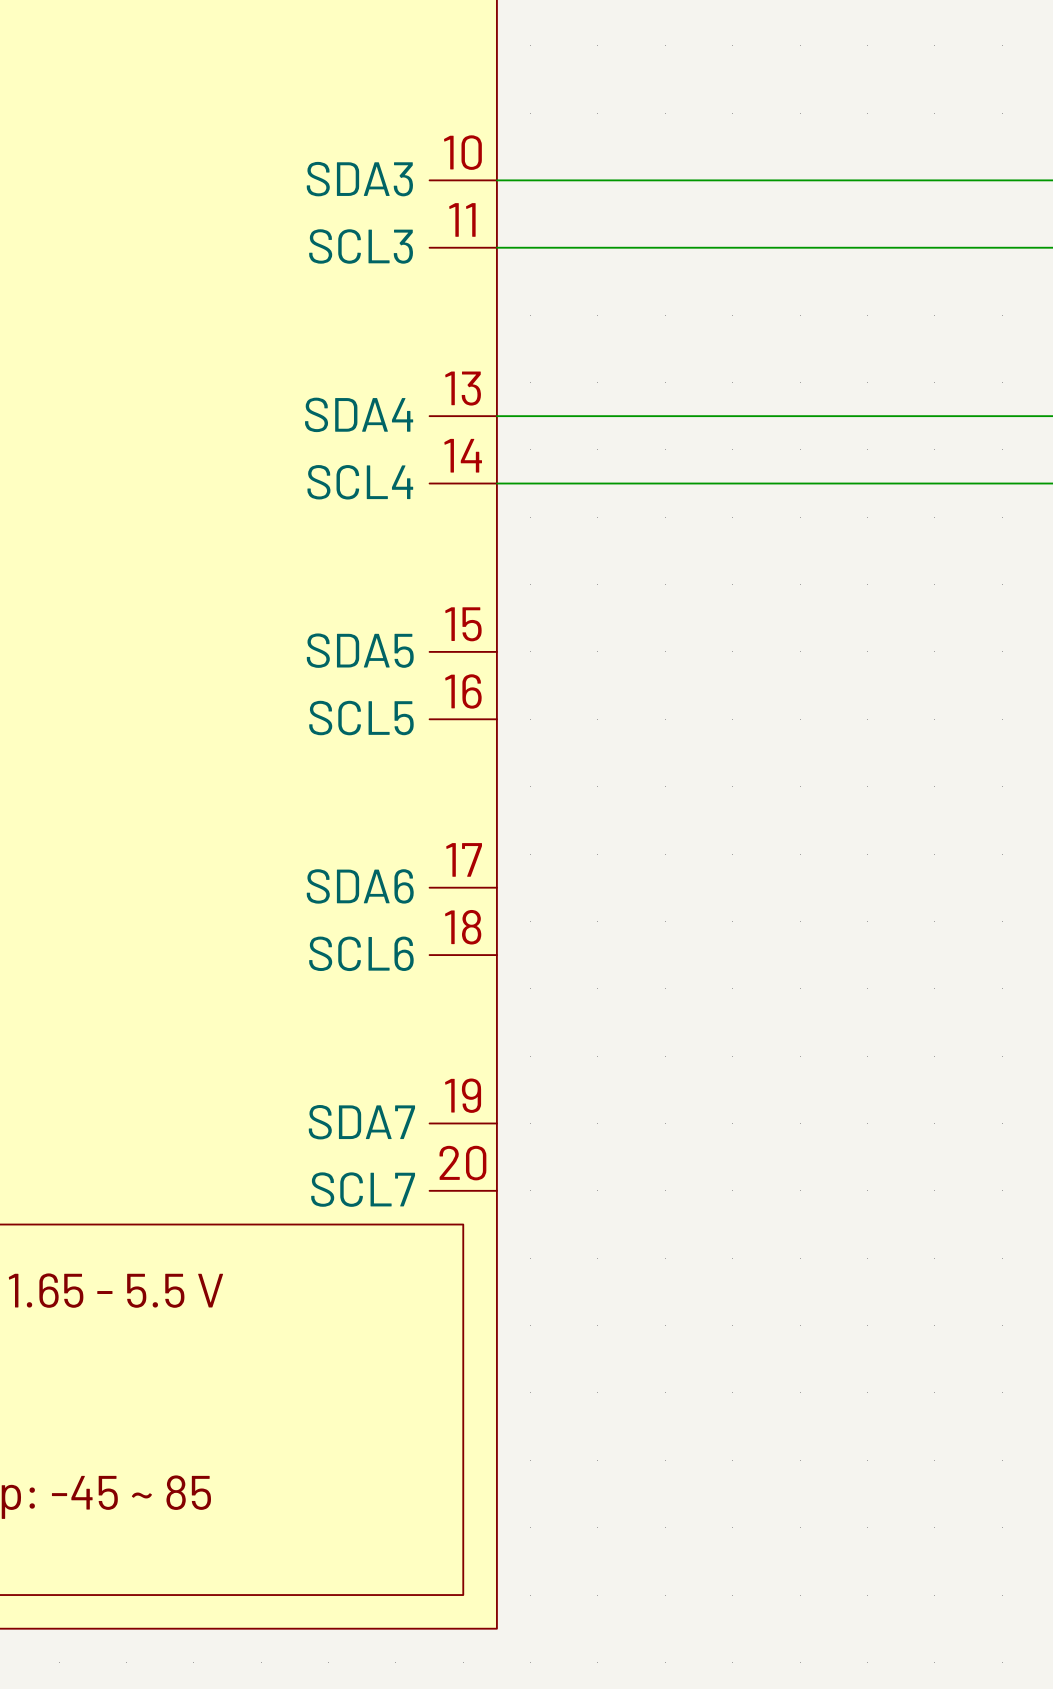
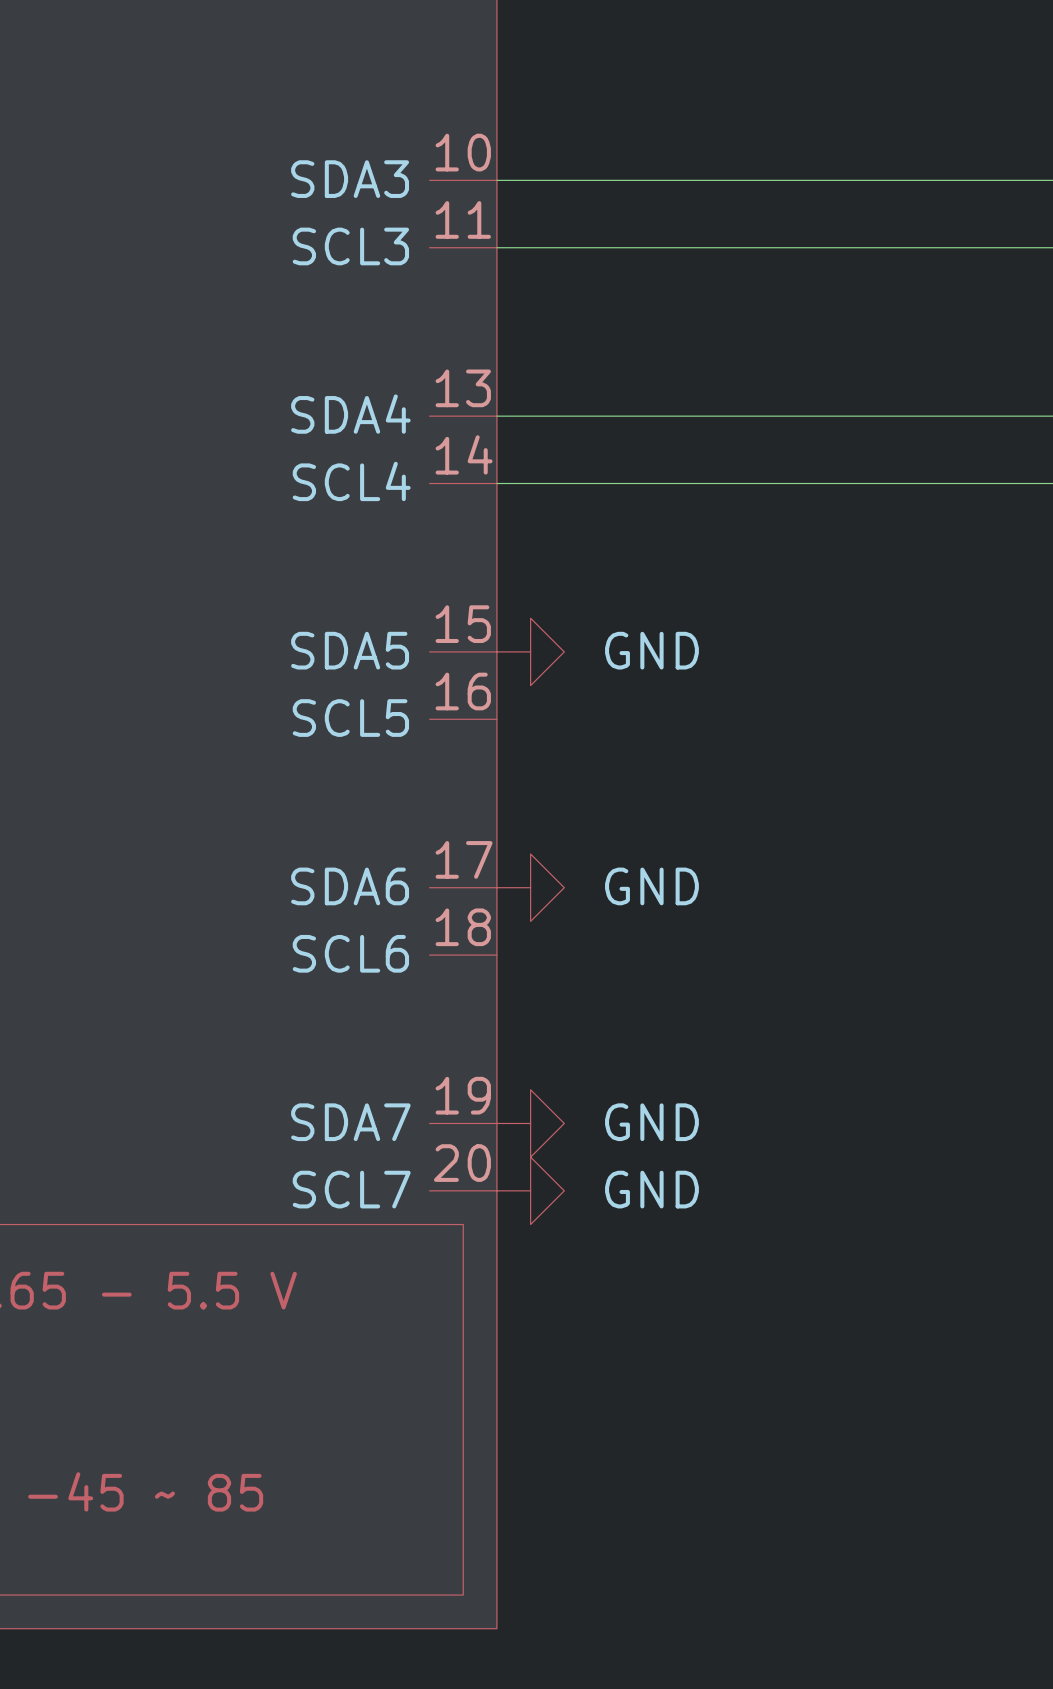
power symbol: none -> GND (530, 651)
power symbol: none -> GND (530, 887)
power symbol: none -> GND (530, 1123)
power symbol: none -> GND (530, 1190)

